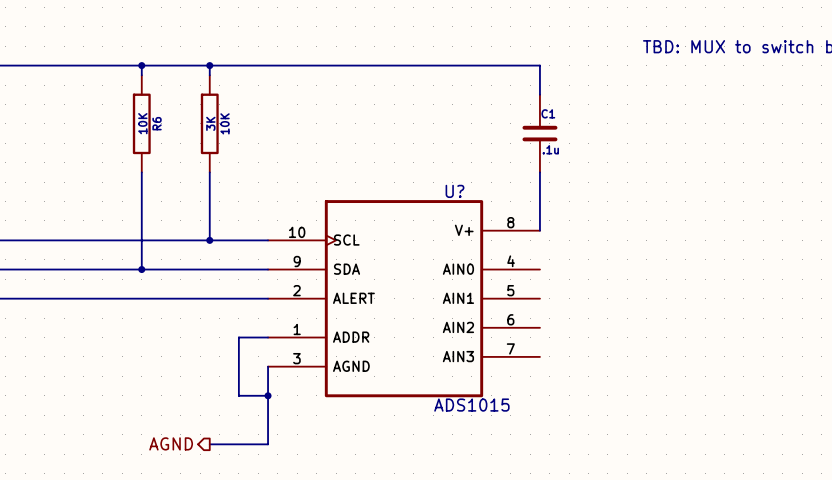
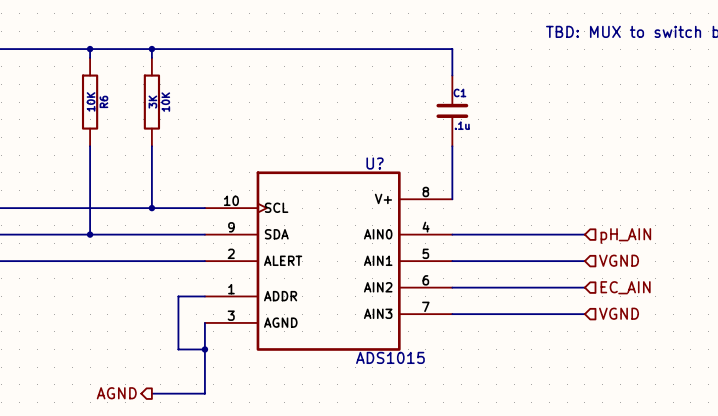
wire: none -> (452, 234) (584, 234)
hierarchical label: none -> pH_AIN (625, 235)
wire: none -> (452, 261) (584, 261)
hierarchical label: none -> VGND (619, 260)
wire: none -> (452, 287) (584, 287)
hierarchical label: none -> EC_AIN (625, 287)
wire: none -> (452, 314) (584, 314)
hierarchical label: none -> VGND (619, 313)

